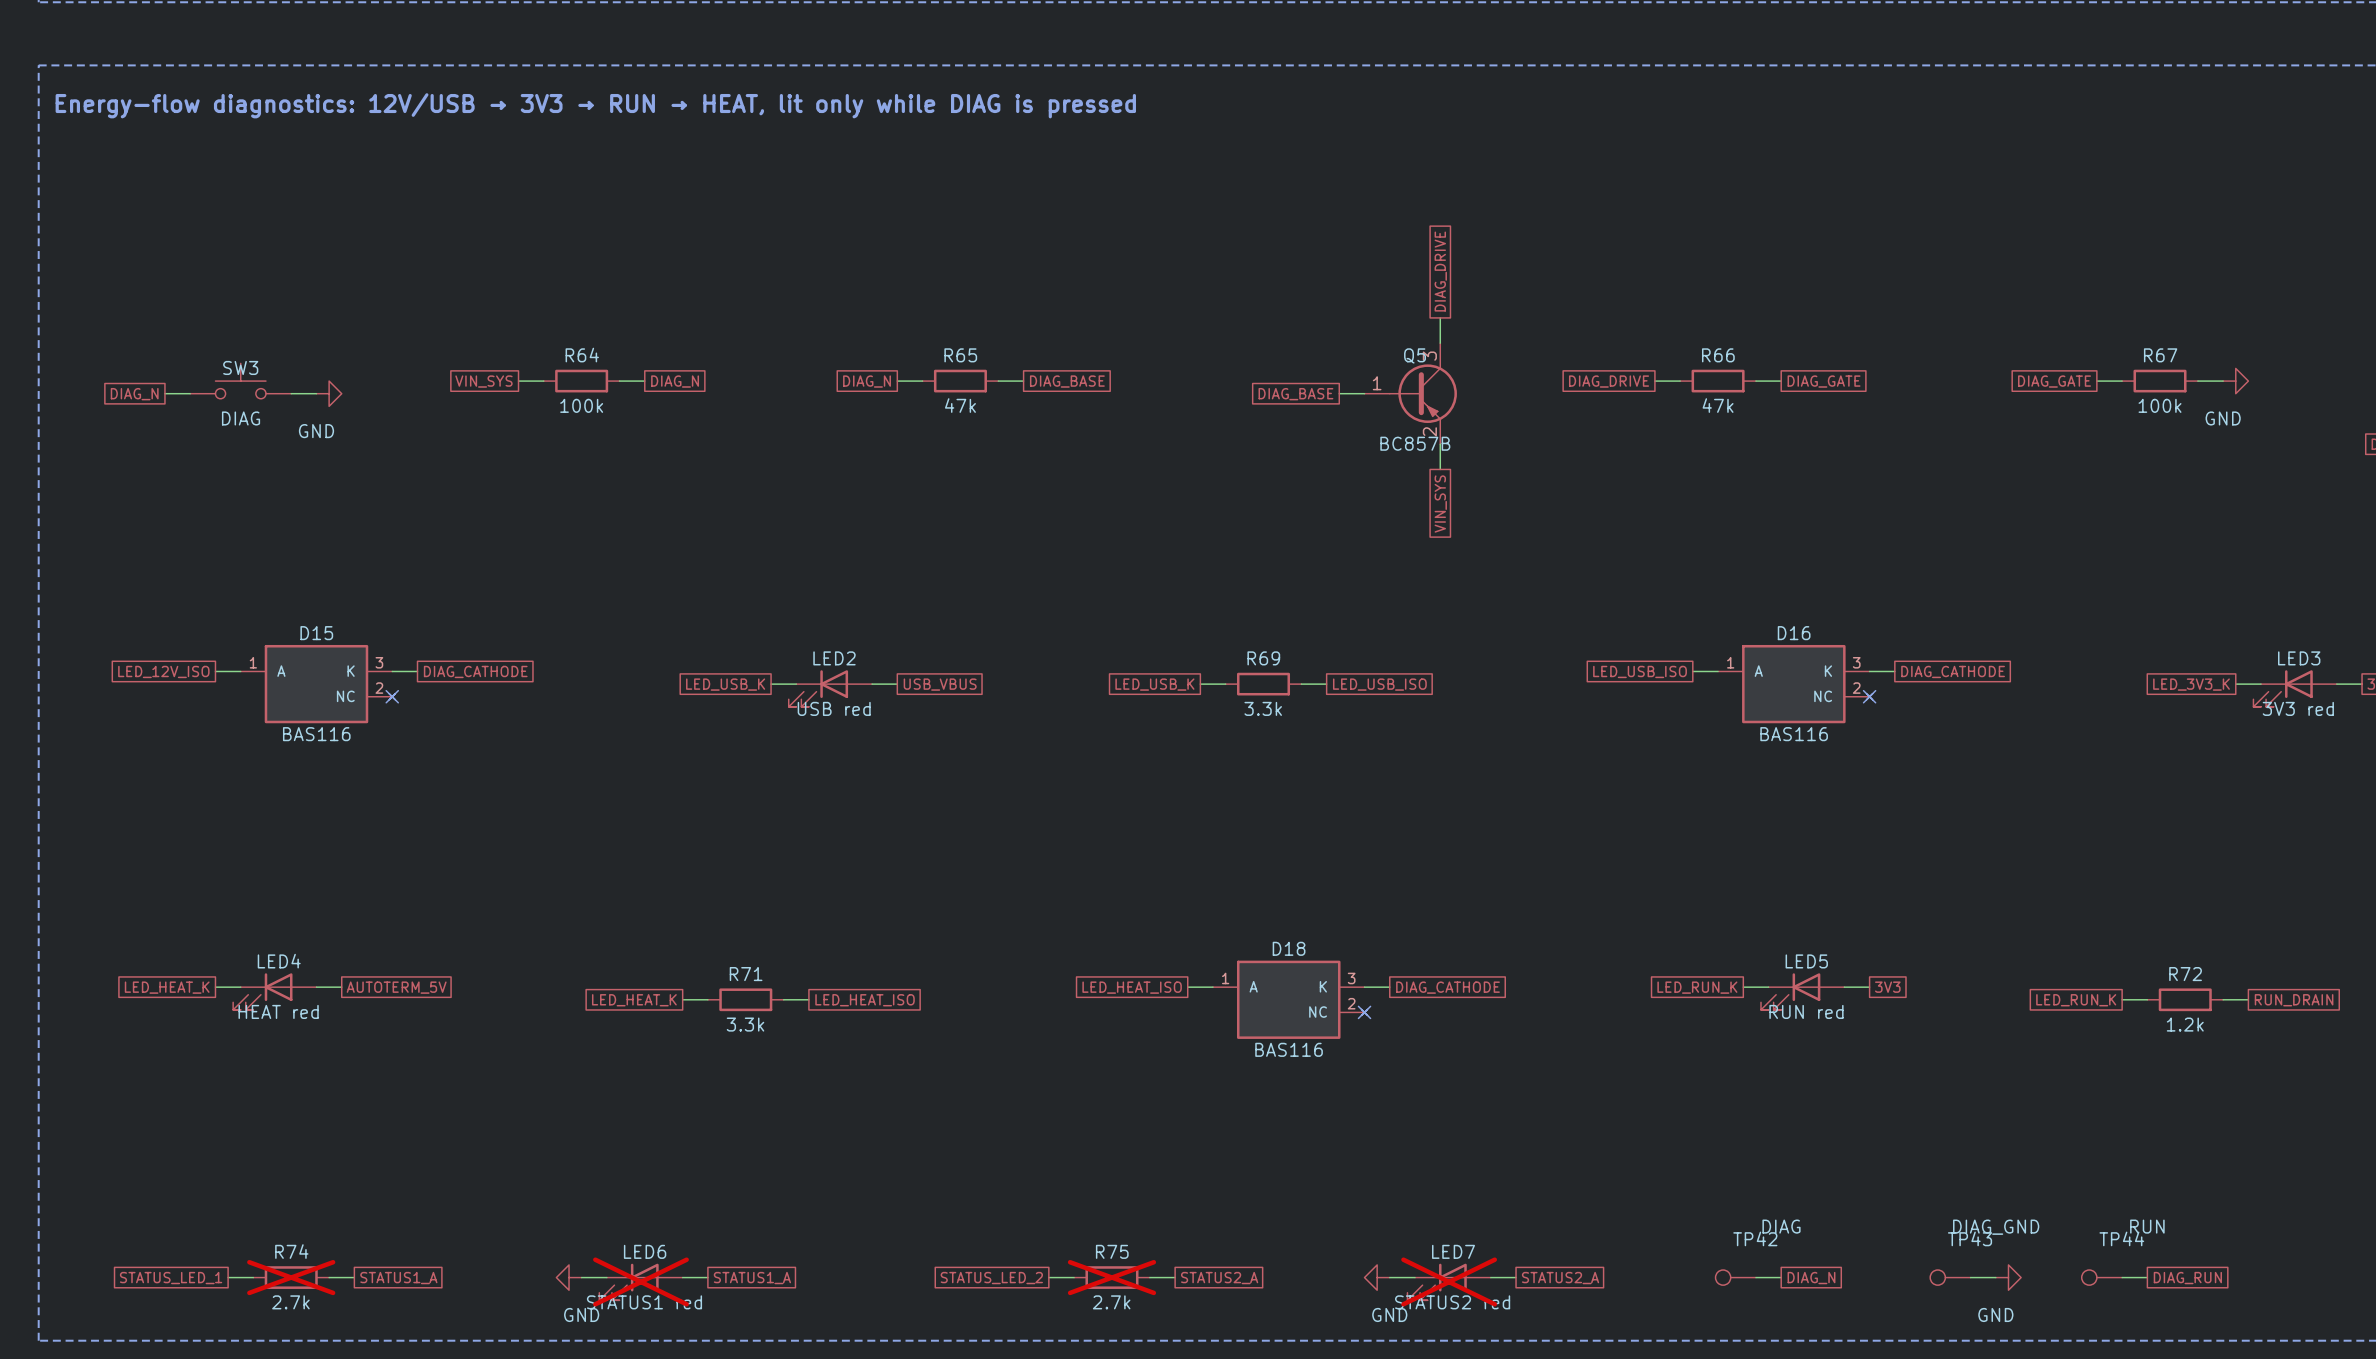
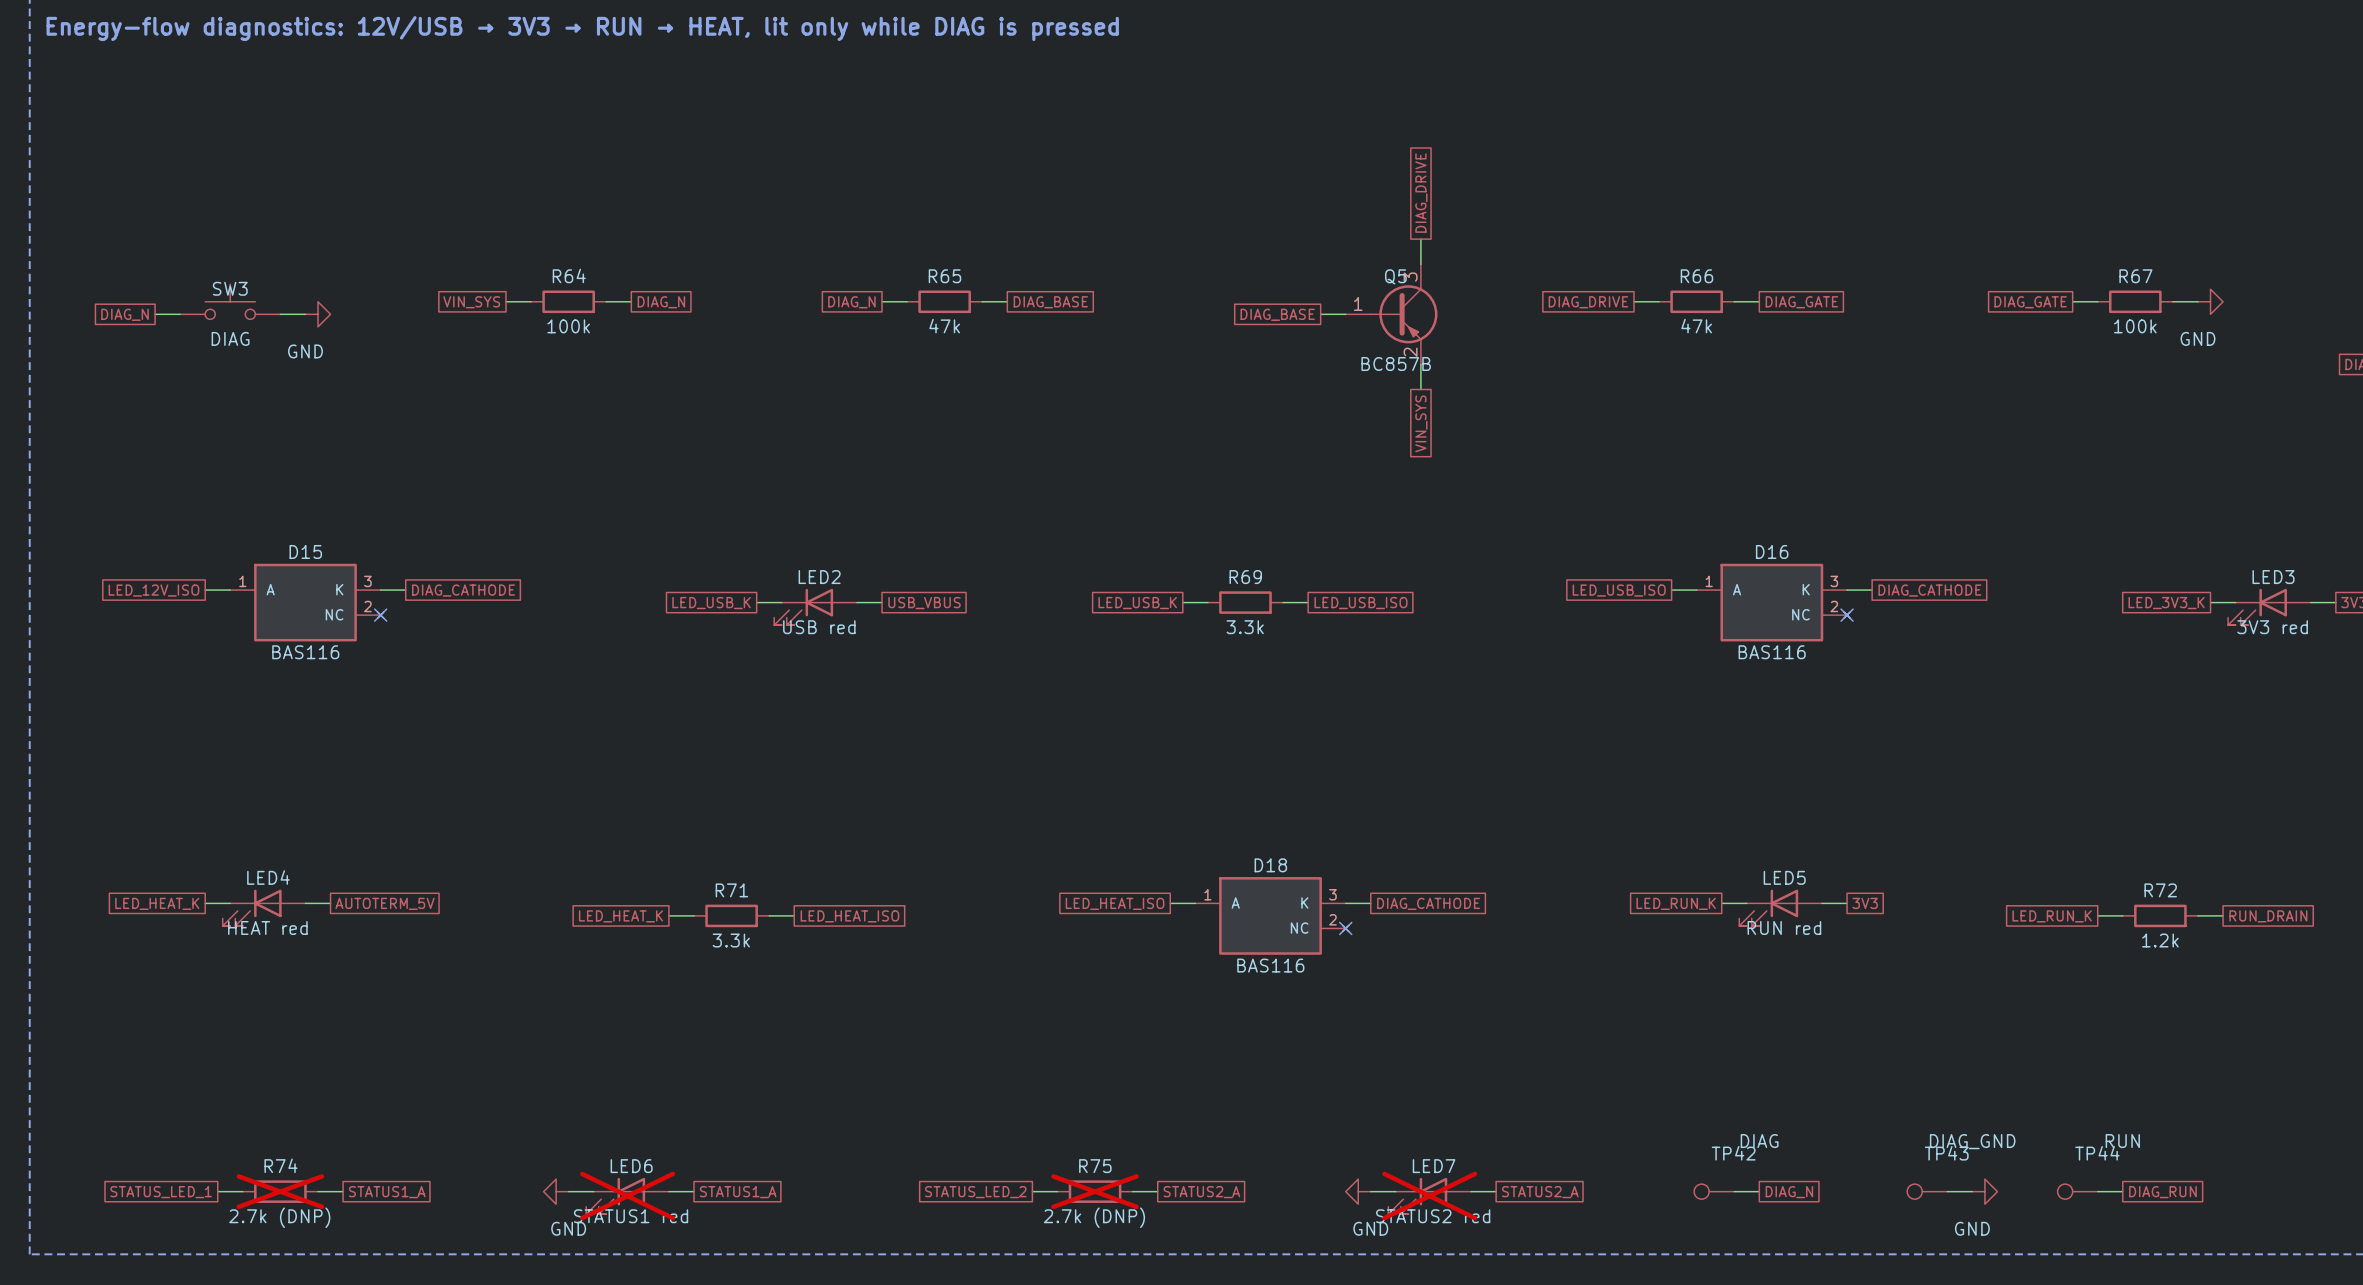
R74 value: 2.7k (290, 1302) -> 2.7k (DNP) (279, 1217)
R75 value: 2.7k (1111, 1302) -> 2.7k (DNP) (1094, 1217)

